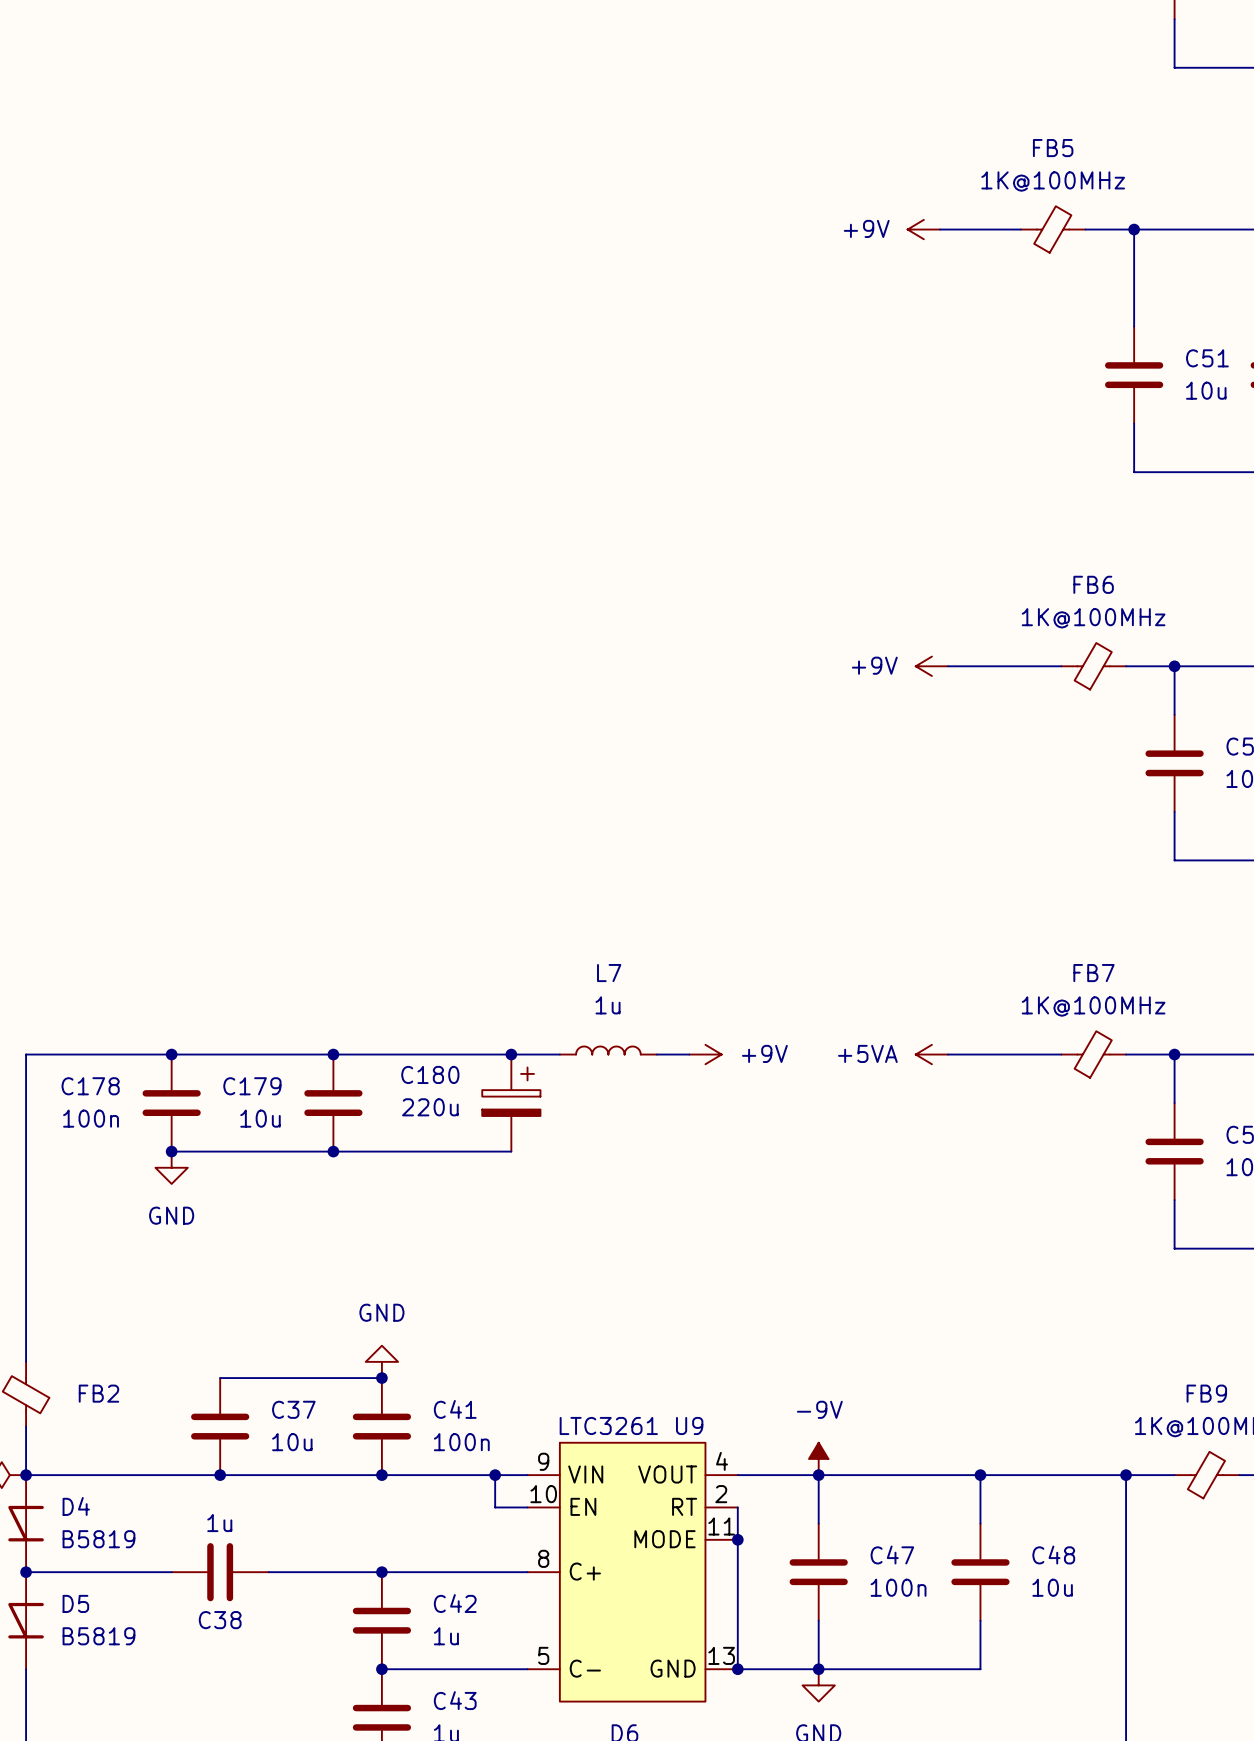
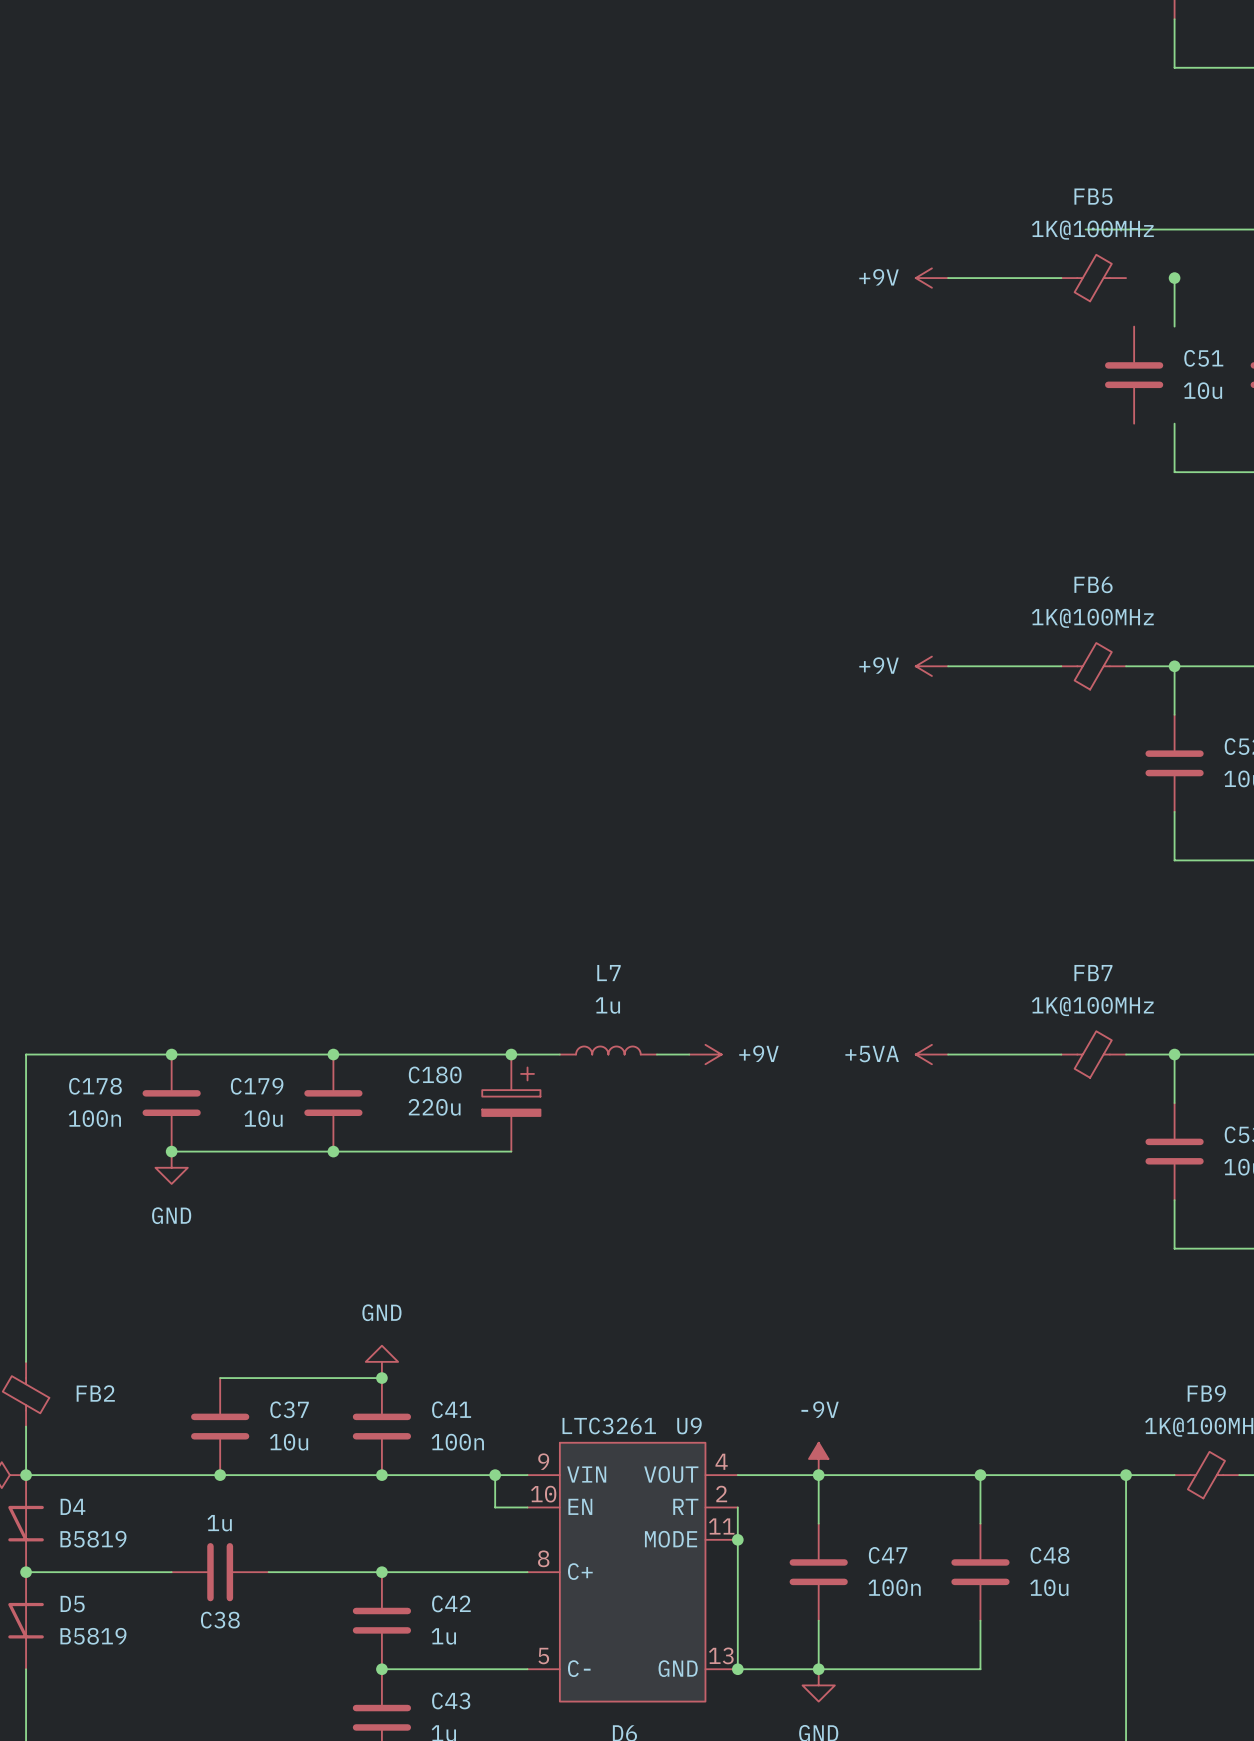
power symbol position: +9V (923, 229) -> +9V (931, 278)
wire: (940, 229) (1020, 229) -> none
FB5 position: (1053, 229) -> (1093, 278)
wire: (1134, 229) (1134, 326) -> none
junction: (1134, 229) -> none
wire: none -> (948, 278) (1061, 278)
wire: none -> (1174, 278) (1174, 326)
junction: none -> (1174, 278)
wire: (1134, 423) (1134, 472) (1174, 472) -> (1174, 423) (1174, 472)

